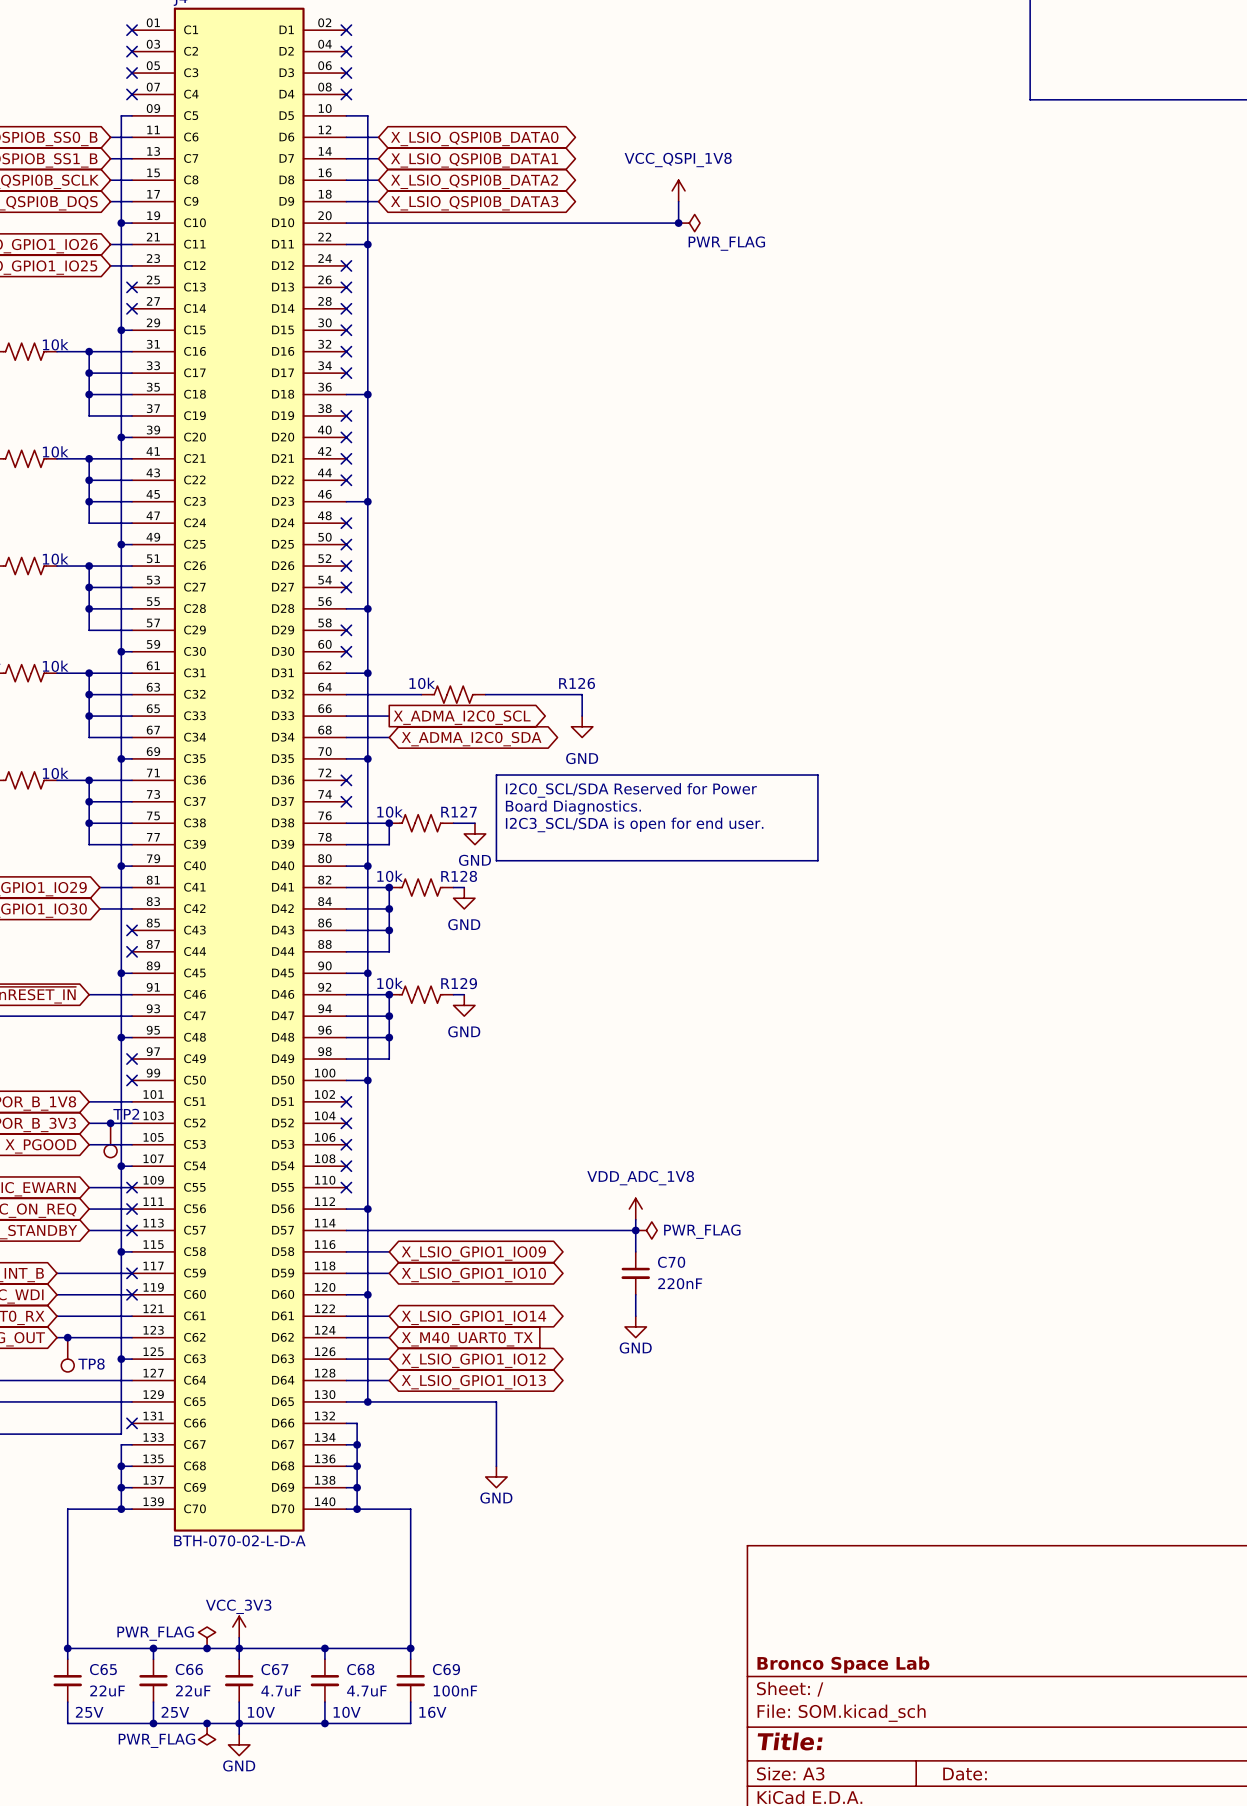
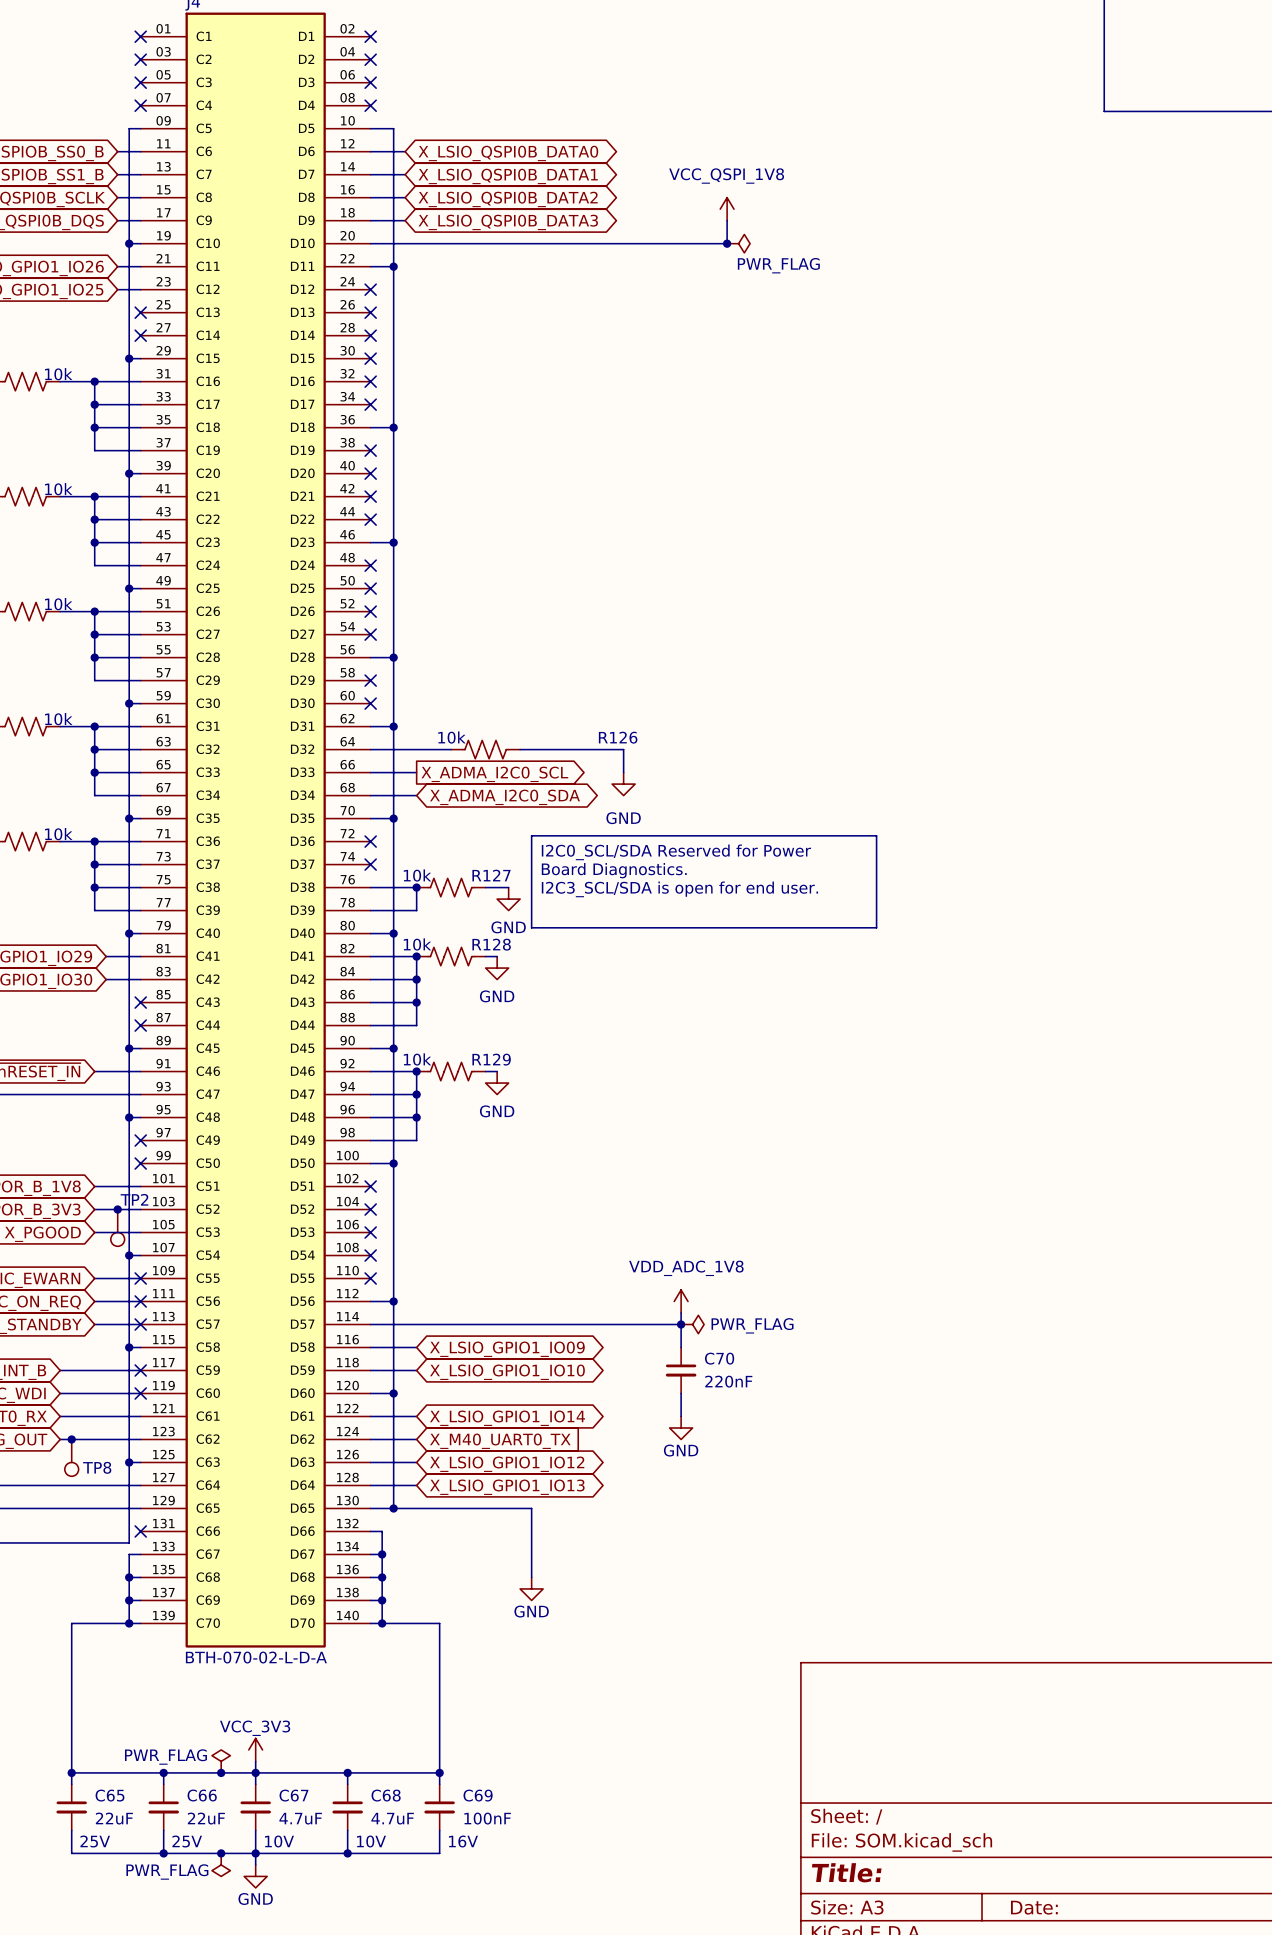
title block: Bronco Space Lab (843, 1664) -> none

